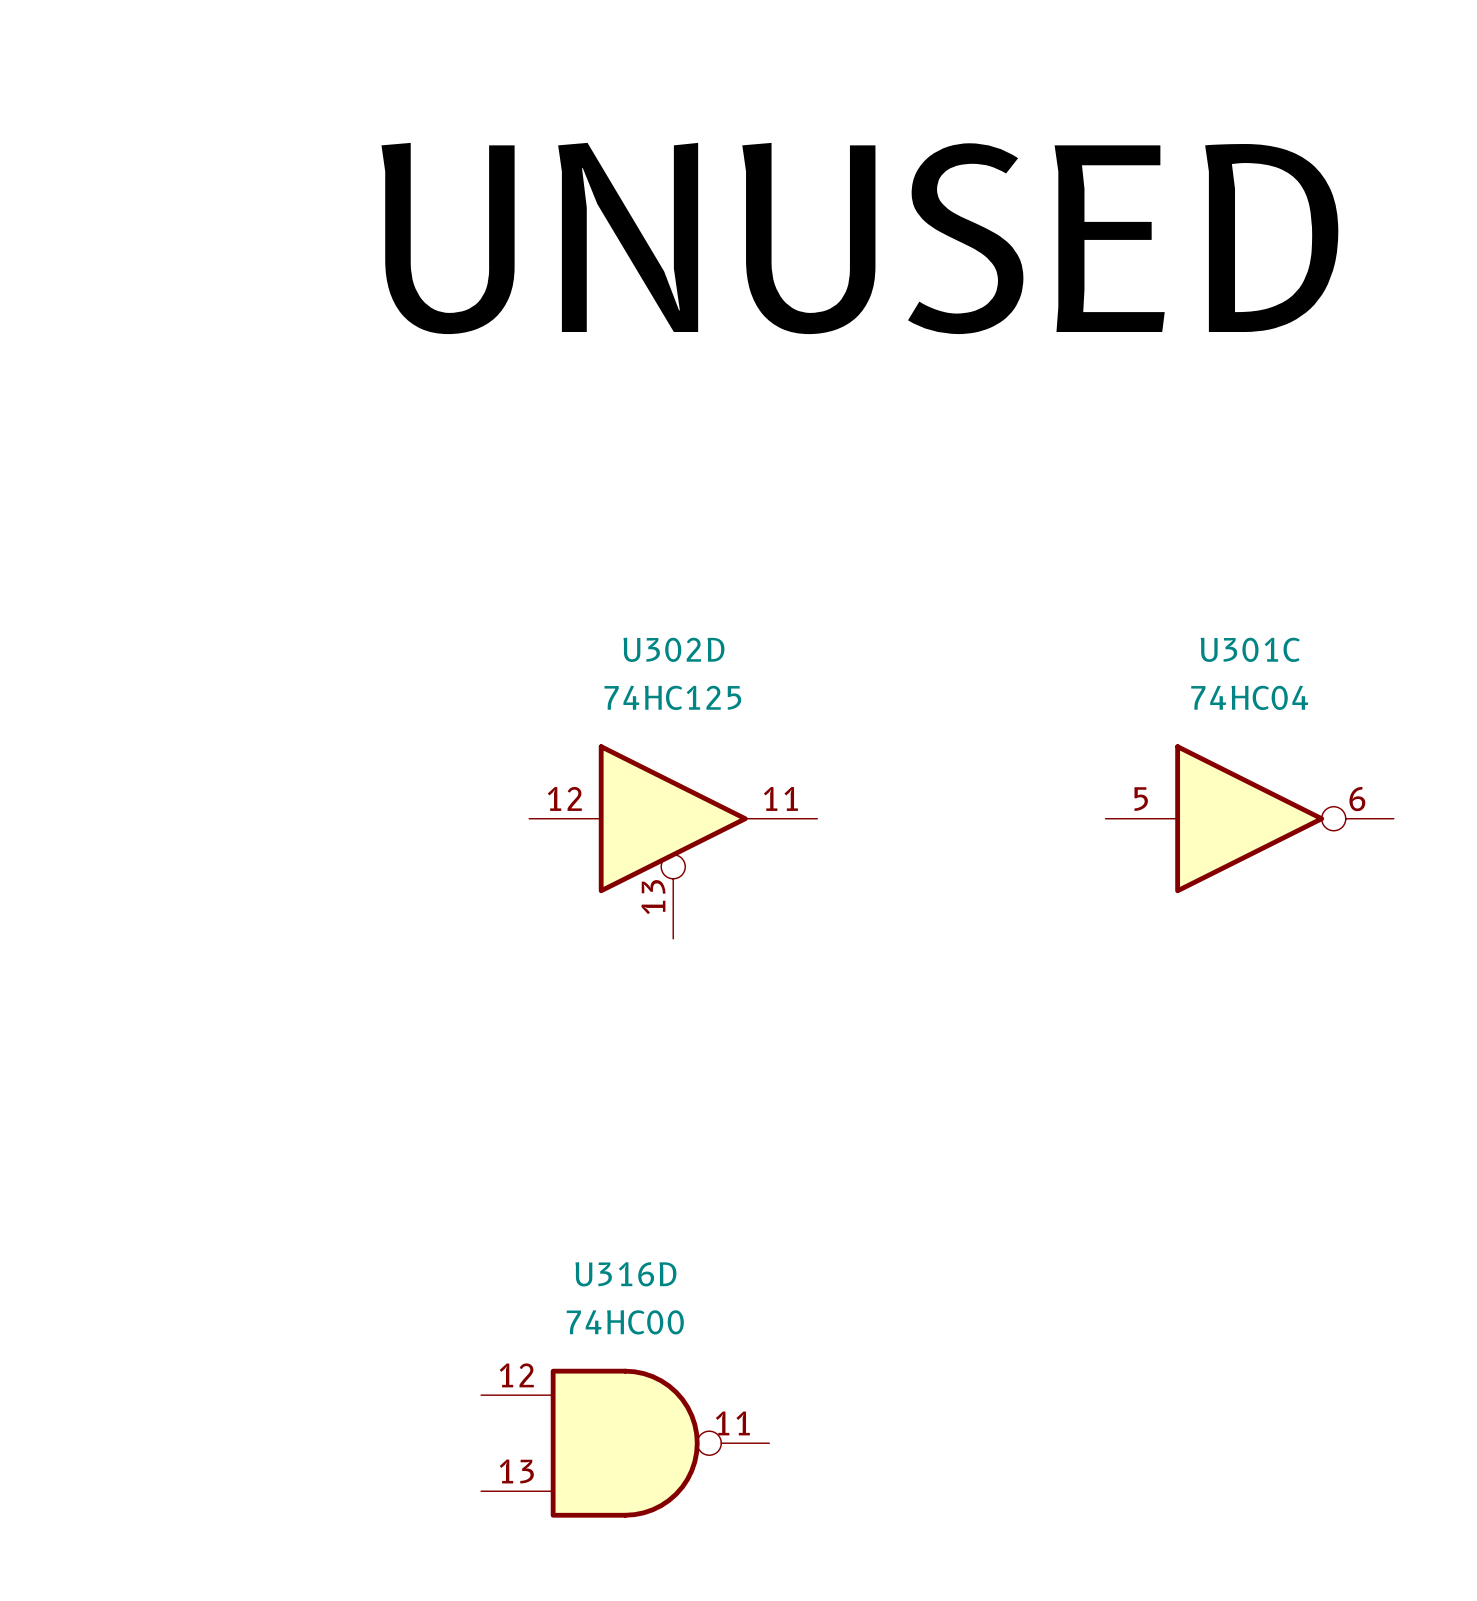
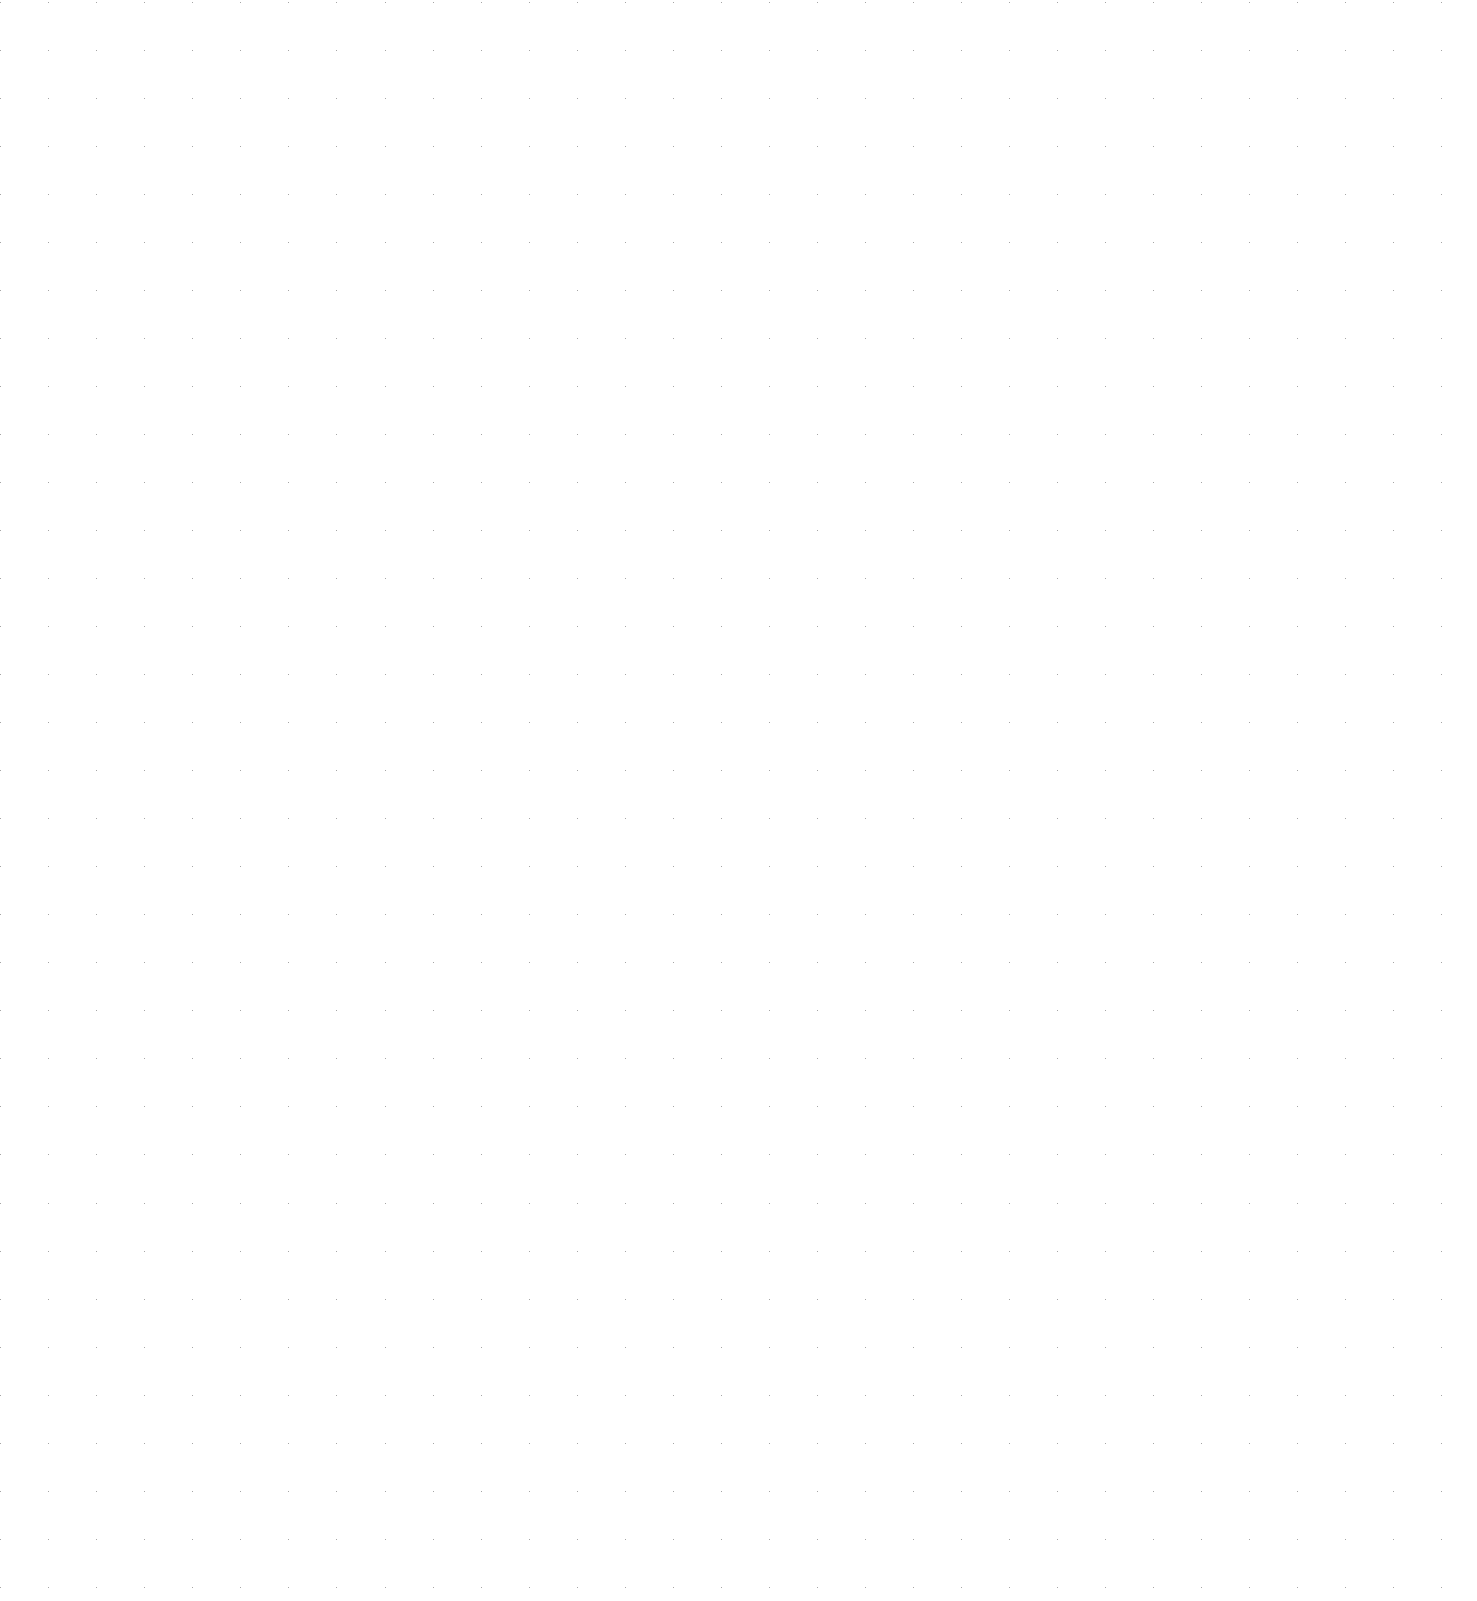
label: UNUSED (859, 238) -> none
U301C: 74HC04 (1249, 818) -> none
U302D: 74HC125 (673, 841) -> none
U316D: 74HC00 (625, 1443) -> none

